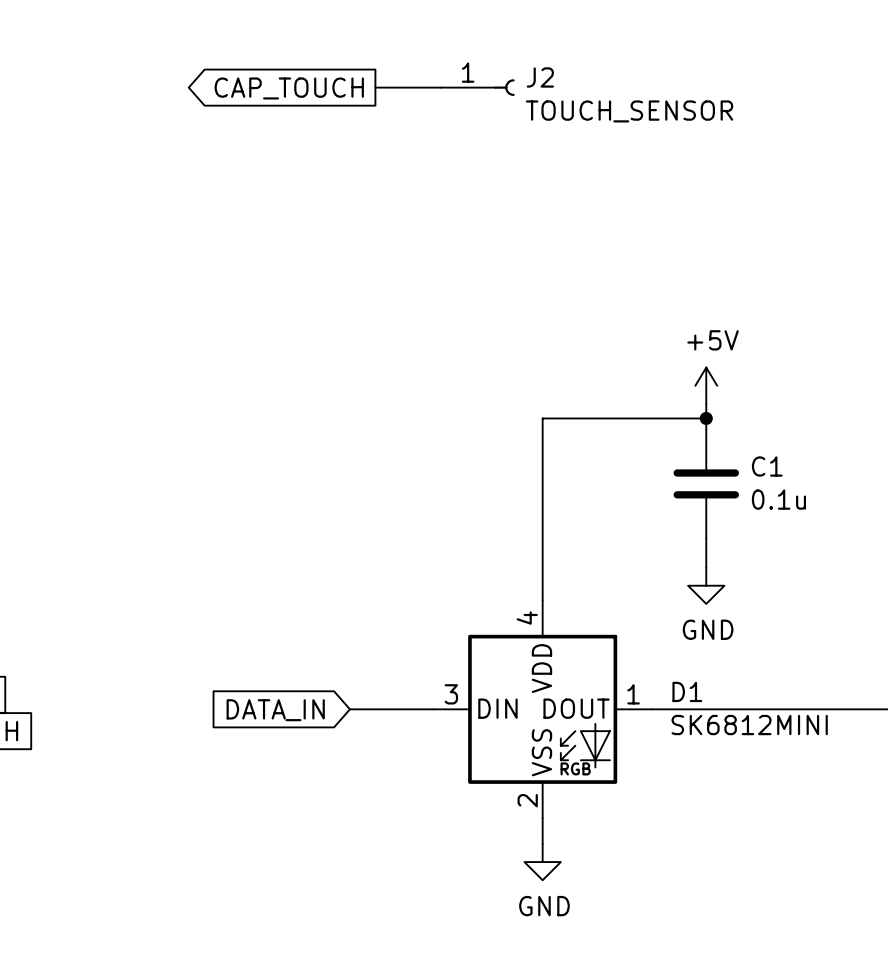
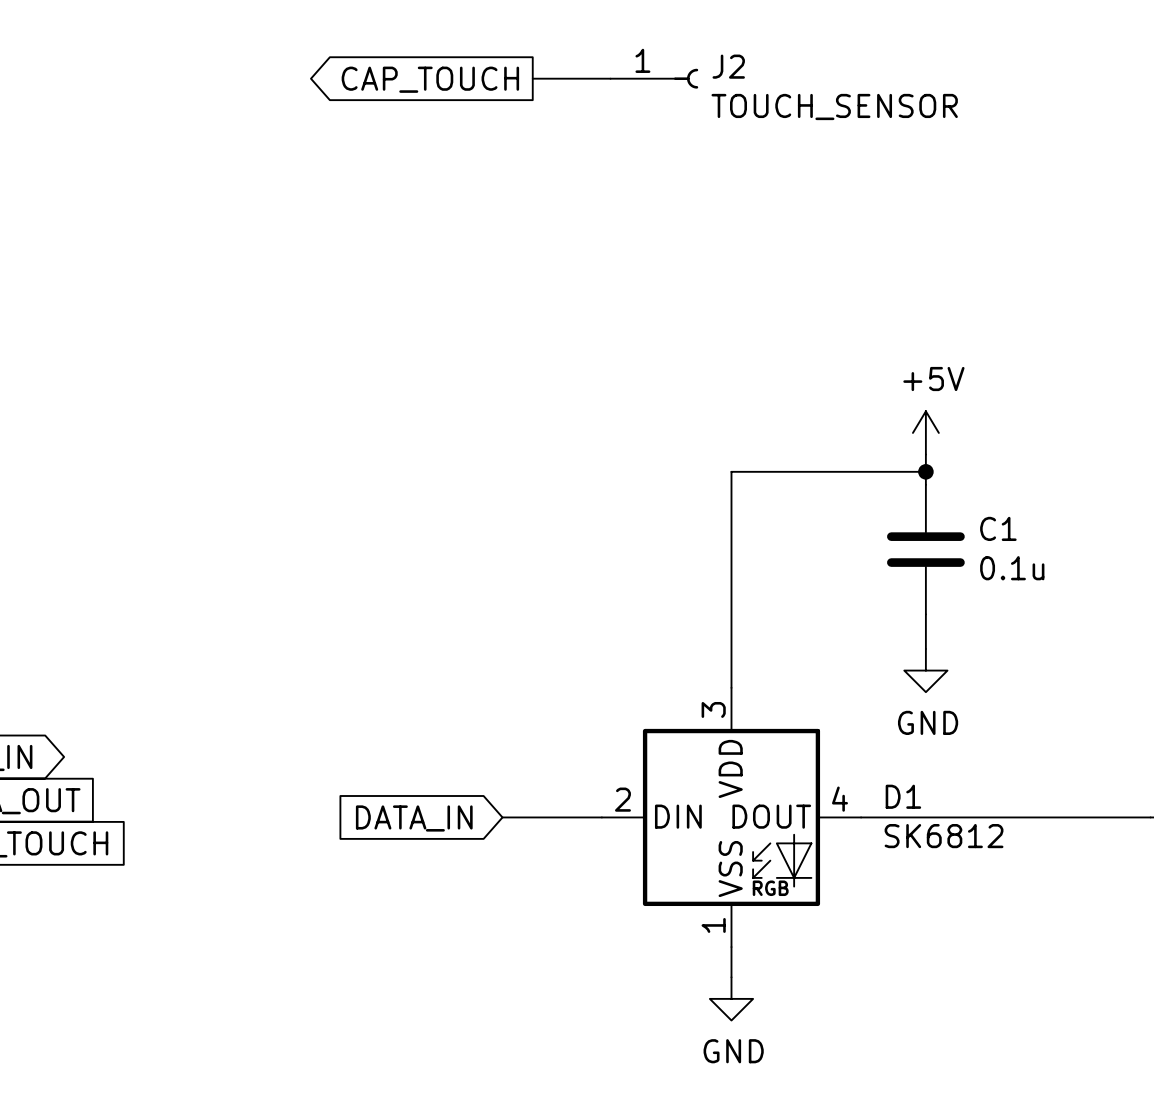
D1 pin number: 4 (527, 618) -> 3 (713, 709)
D1 pin number: 3 (451, 694) -> 2 (622, 799)
D1 pin number: 1 (633, 694) -> 4 (840, 799)
D1 value: SK6812MINI (749, 725) -> SK6812 (944, 836)
D1 pin number: 2 (527, 800) -> 1 (713, 925)

